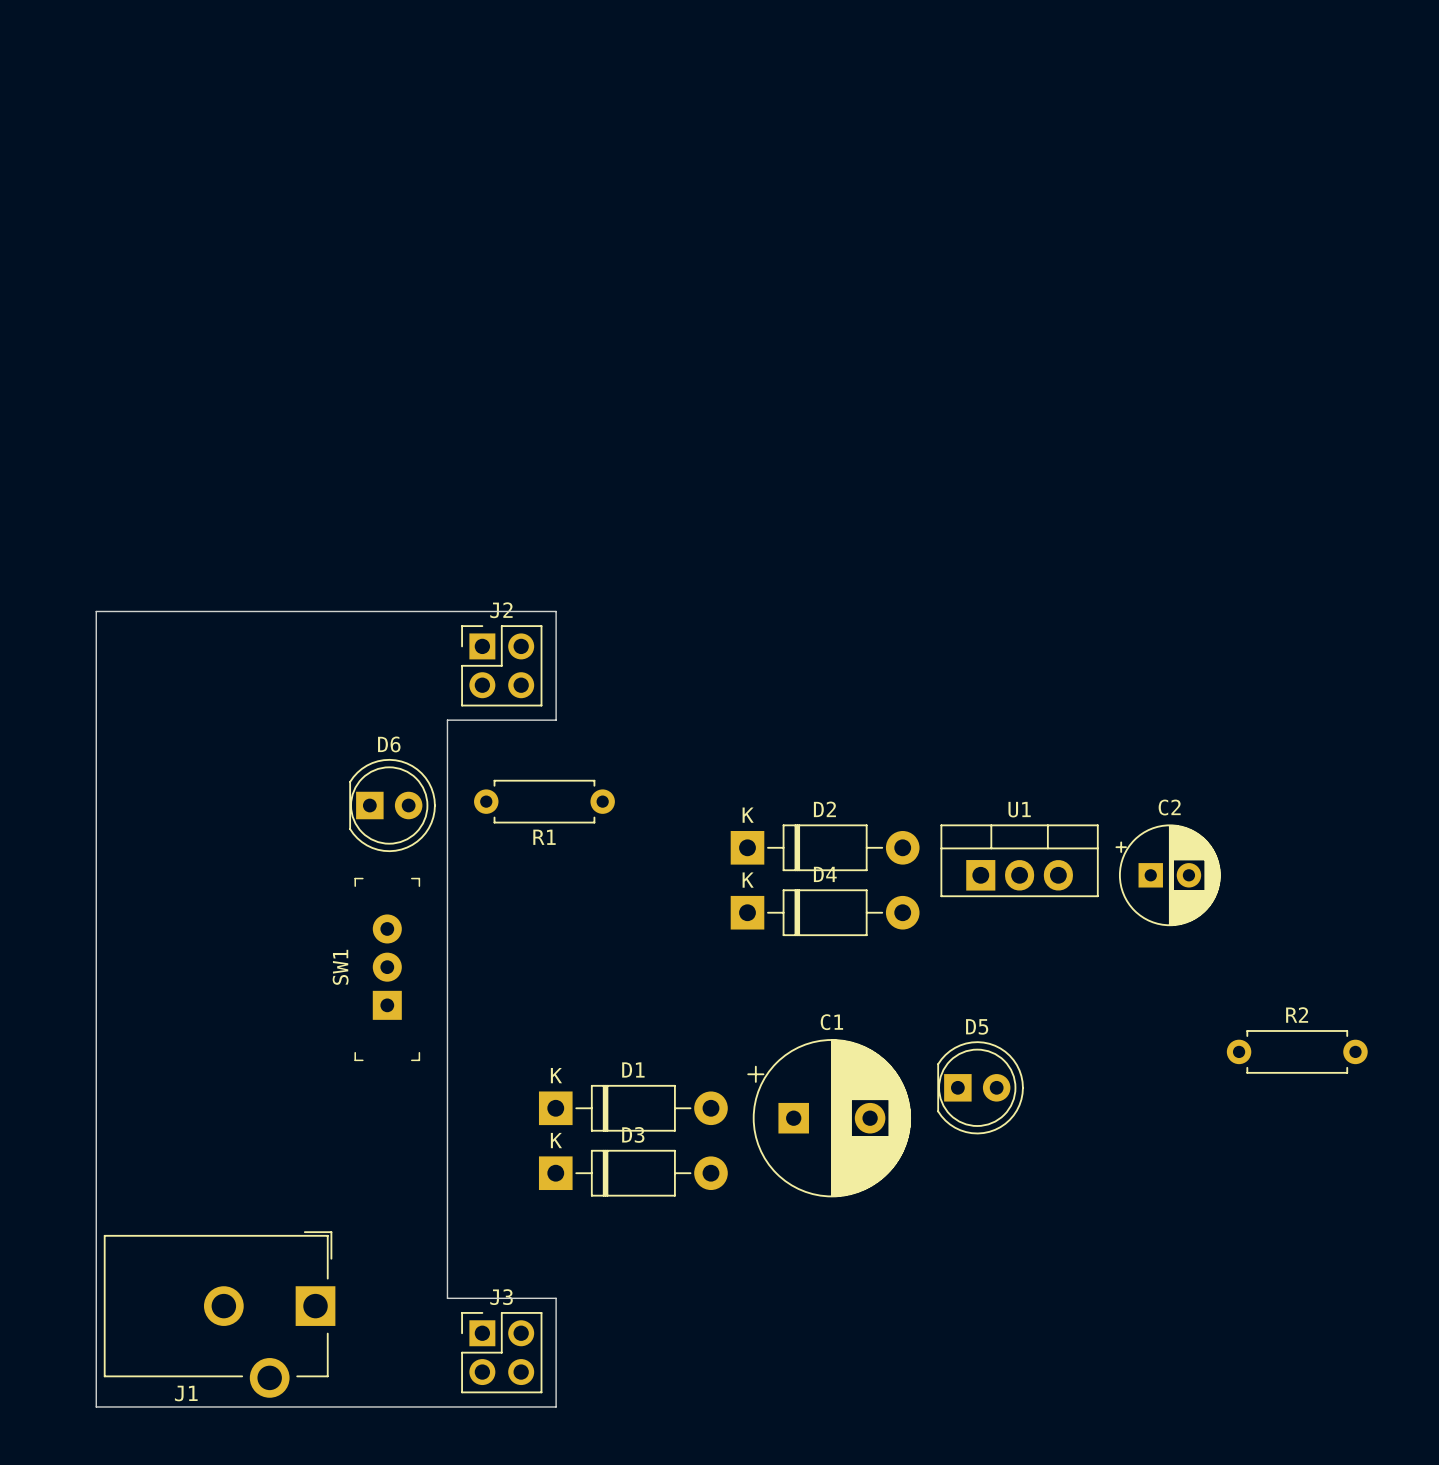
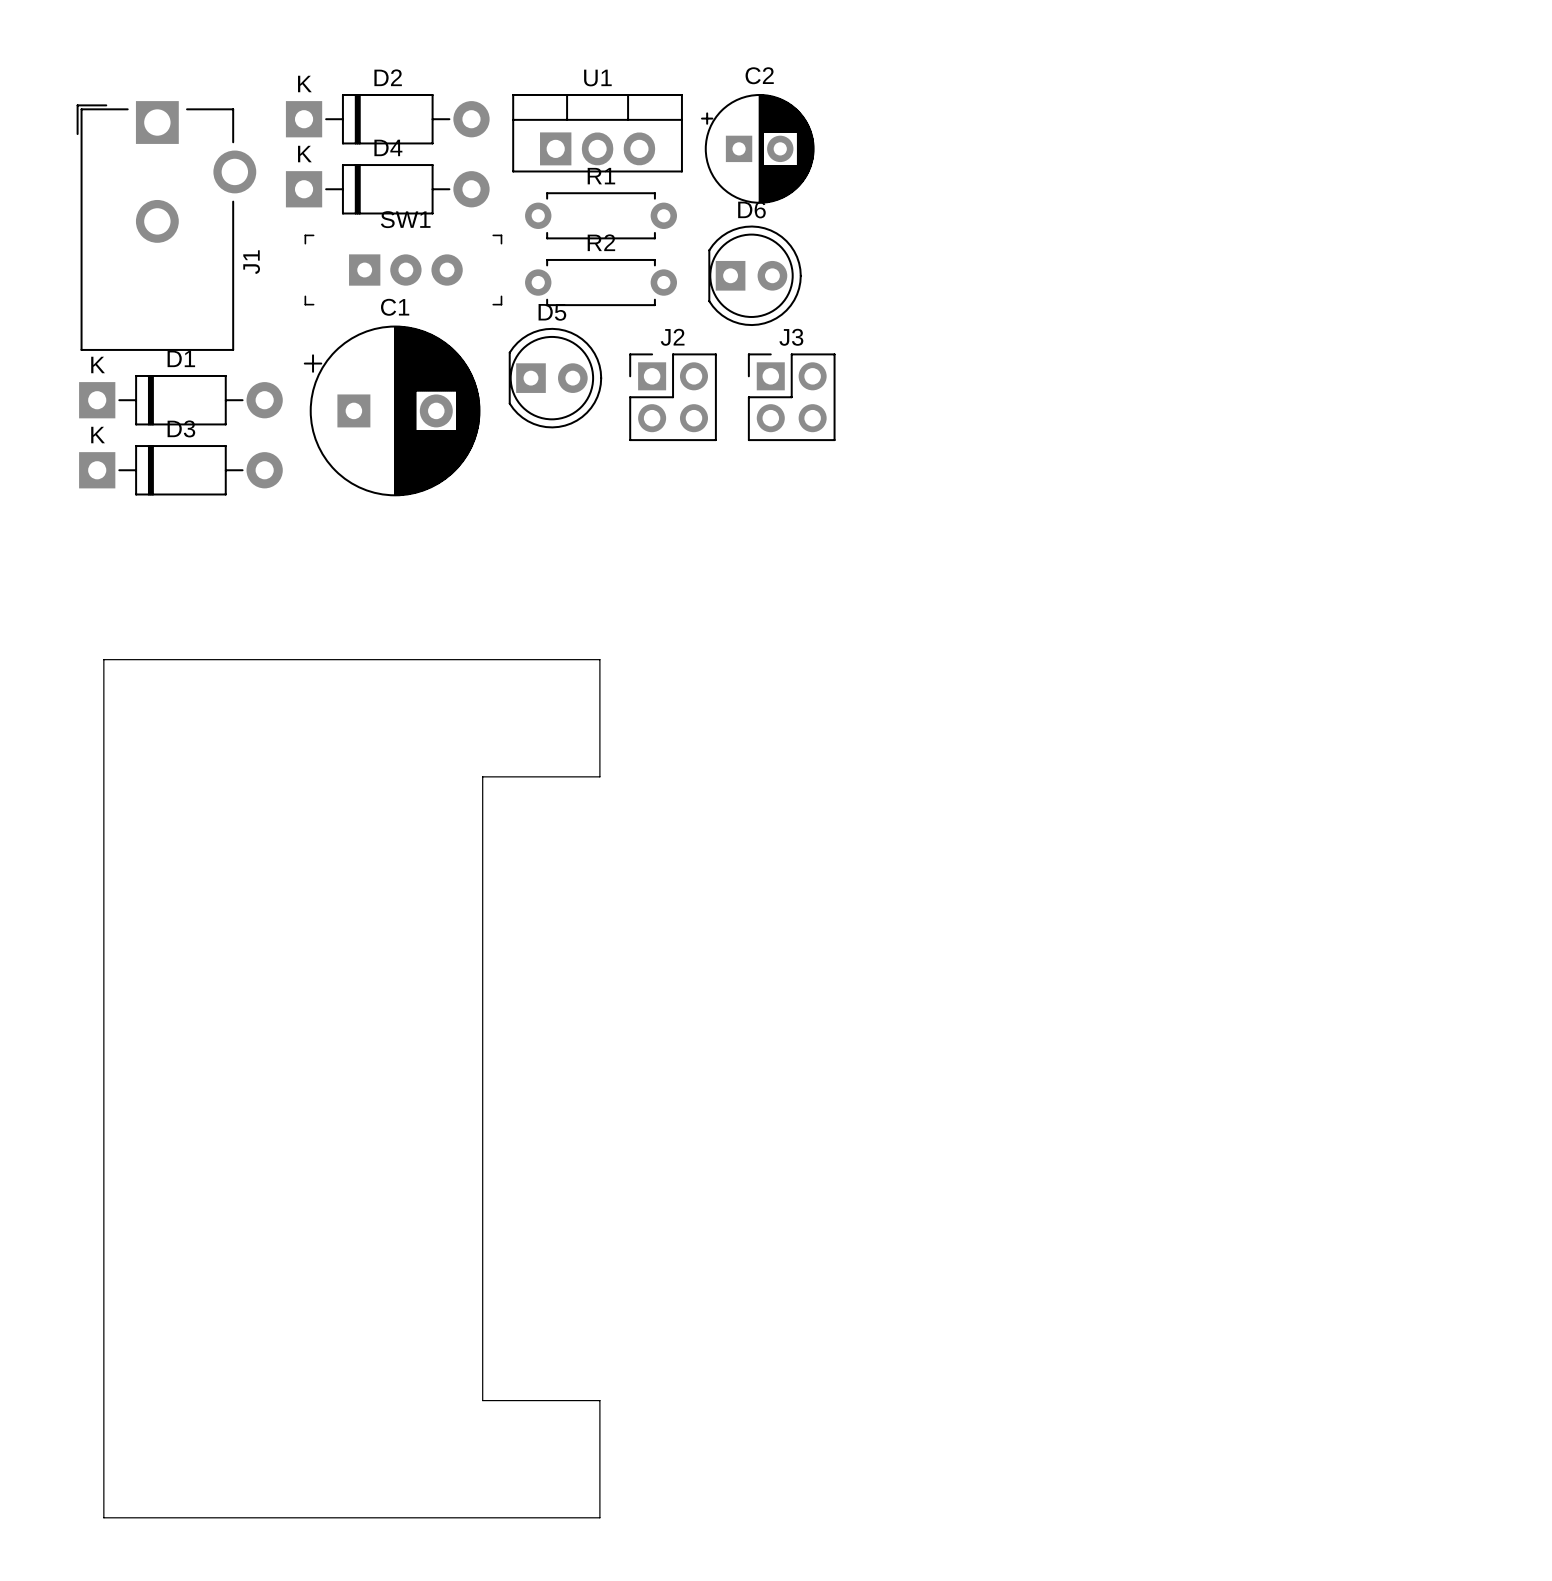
J2 position: (501, 665) -> (673, 397)
R1 position: (544, 801) -> (601, 215)
D6 position: (392, 805) -> (755, 275)
R1 name position: R1 (544, 837) -> R1 (601, 176)
D2 position: (825, 847) -> (387, 119)
U1 position: (1019, 860) -> (597, 133)
C2 position: (1168, 875) -> (757, 148)
D4 position: (825, 912) -> (387, 189)
SW1 rotation: 0° (387, 969) -> 90° clockwise (403, 270)
SW1 position: (387, 969) -> (403, 270)
R2 position: (1297, 1051) -> (601, 282)
D5 position: (980, 1087) -> (555, 378)
D1 position: (633, 1108) -> (180, 400)
C1 position: (829, 1118) -> (392, 410)
D3 position: (633, 1173) -> (180, 470)
J1 rotation: 0° (219, 1314) -> 90° counterclockwise (166, 226)
J1 position: (219, 1314) -> (166, 226)
J3 position: (501, 1352) -> (791, 397)

